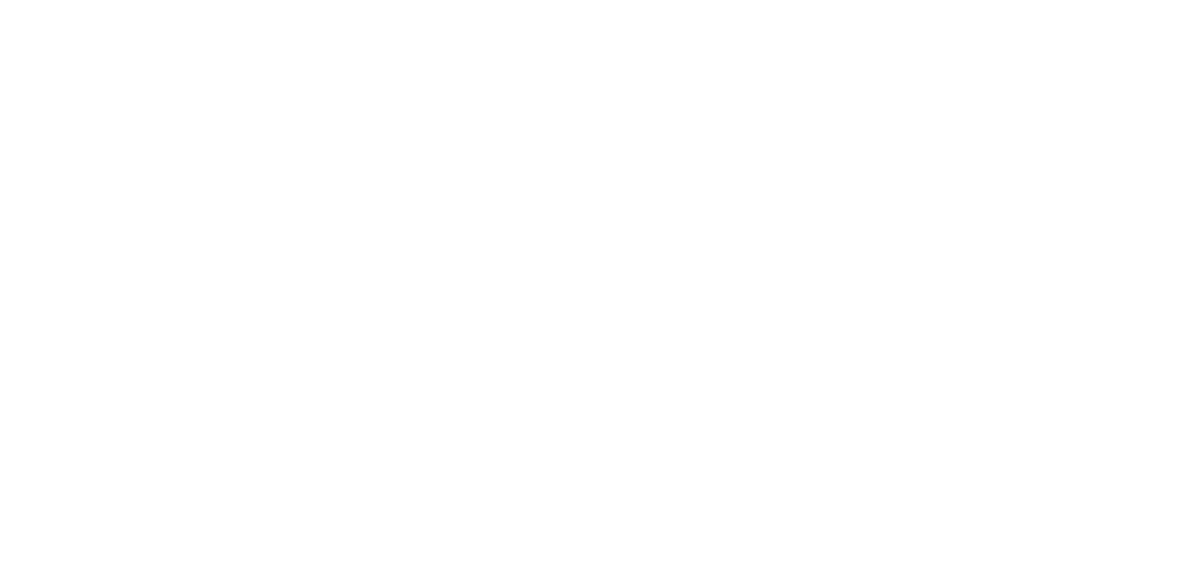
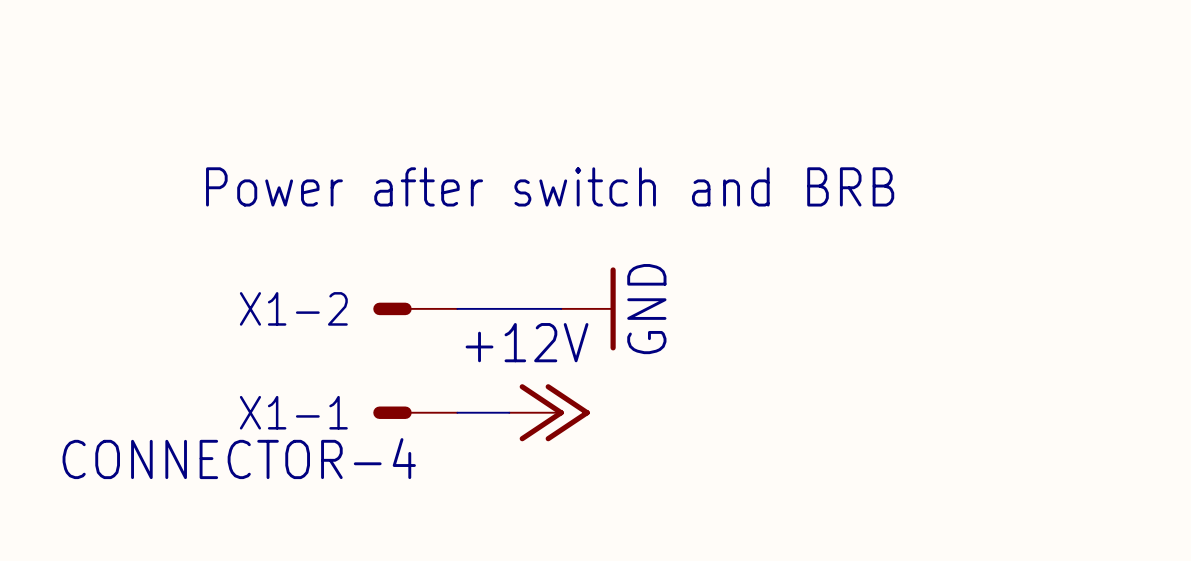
text: none -> Power after switch and BRB (550, 186)
X1-2: none -> (415, 308)
wire: none -> (457, 308) (561, 308)
power symbol: none -> GND (588, 308)
X1-1: none -> CONNECTOR-4 (415, 412)
wire: none -> (457, 412) (509, 412)
power symbol: none -> +12V (549, 412)

